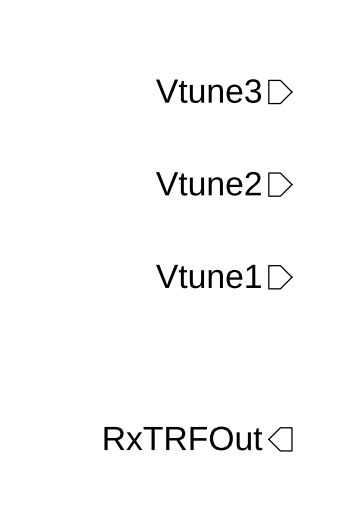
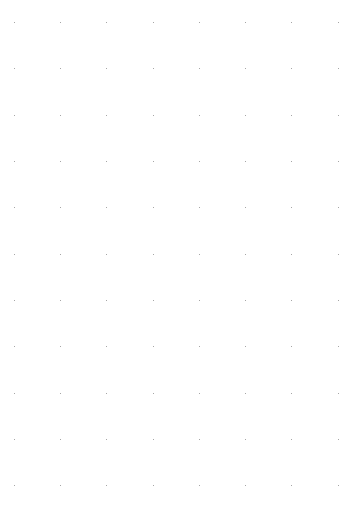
hierarchical label: Vtune3 (208, 91) -> none
hierarchical label: Vtune2 (208, 183) -> none
hierarchical label: Vtune1 (208, 276) -> none
hierarchical label: RxTRFOut (183, 438) -> none

